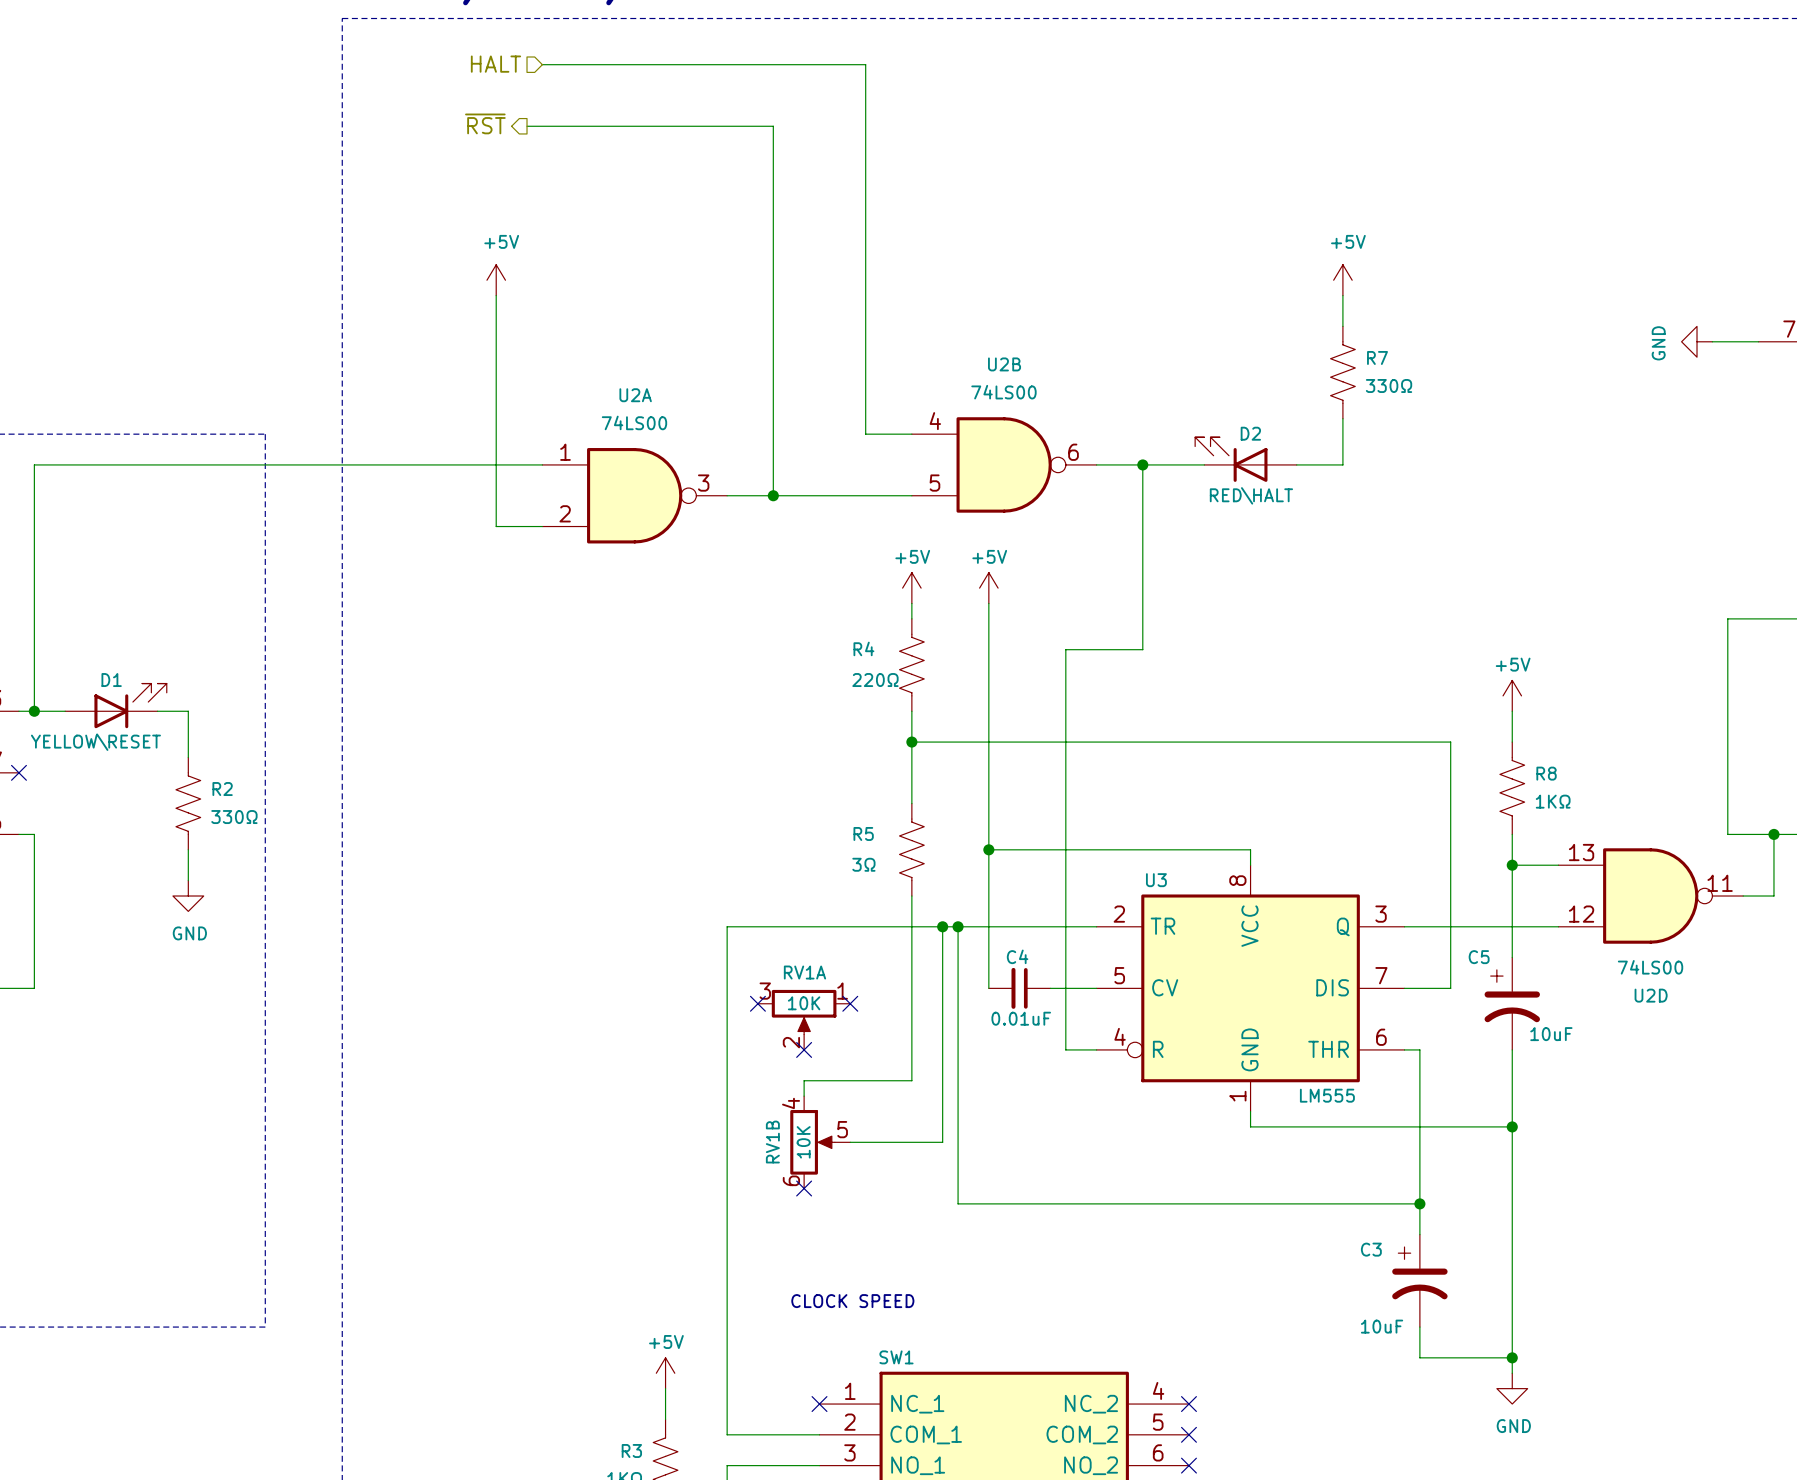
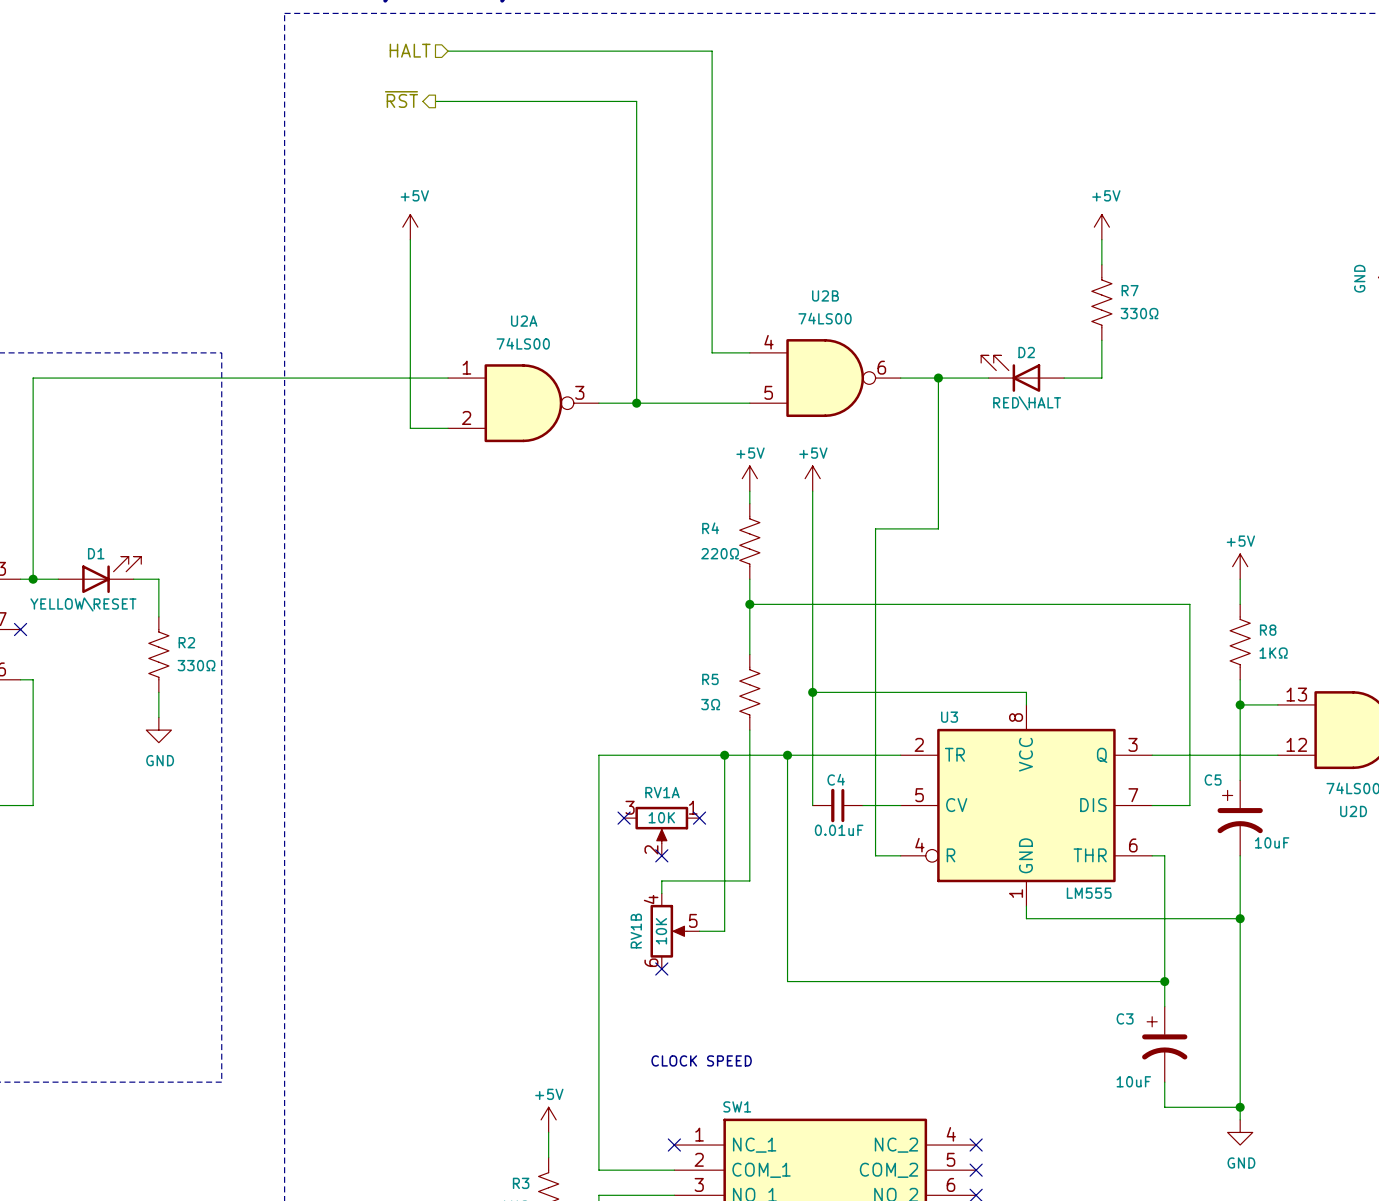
wire: (942, 926) (942, 1142) (881, 1142) -> (724, 755) (724, 931)
junction position: (942, 926) -> (724, 755)

